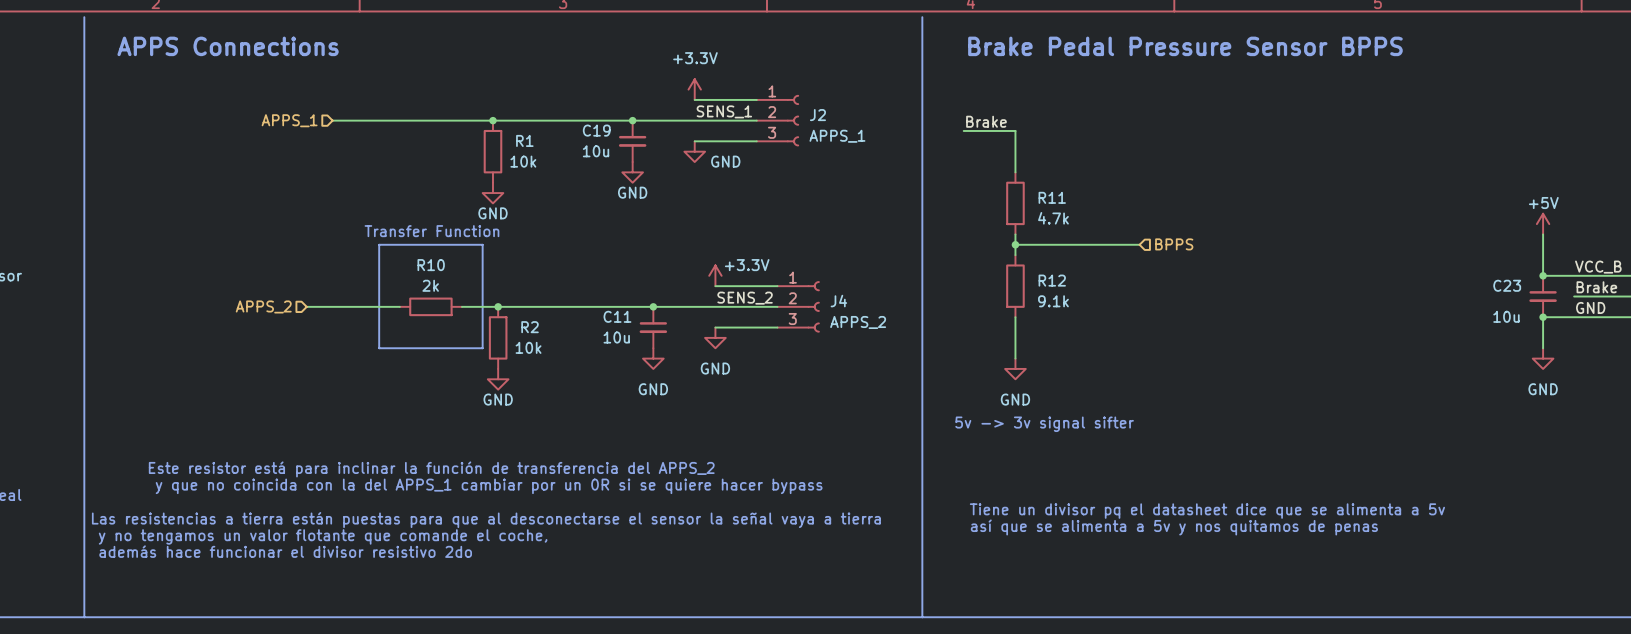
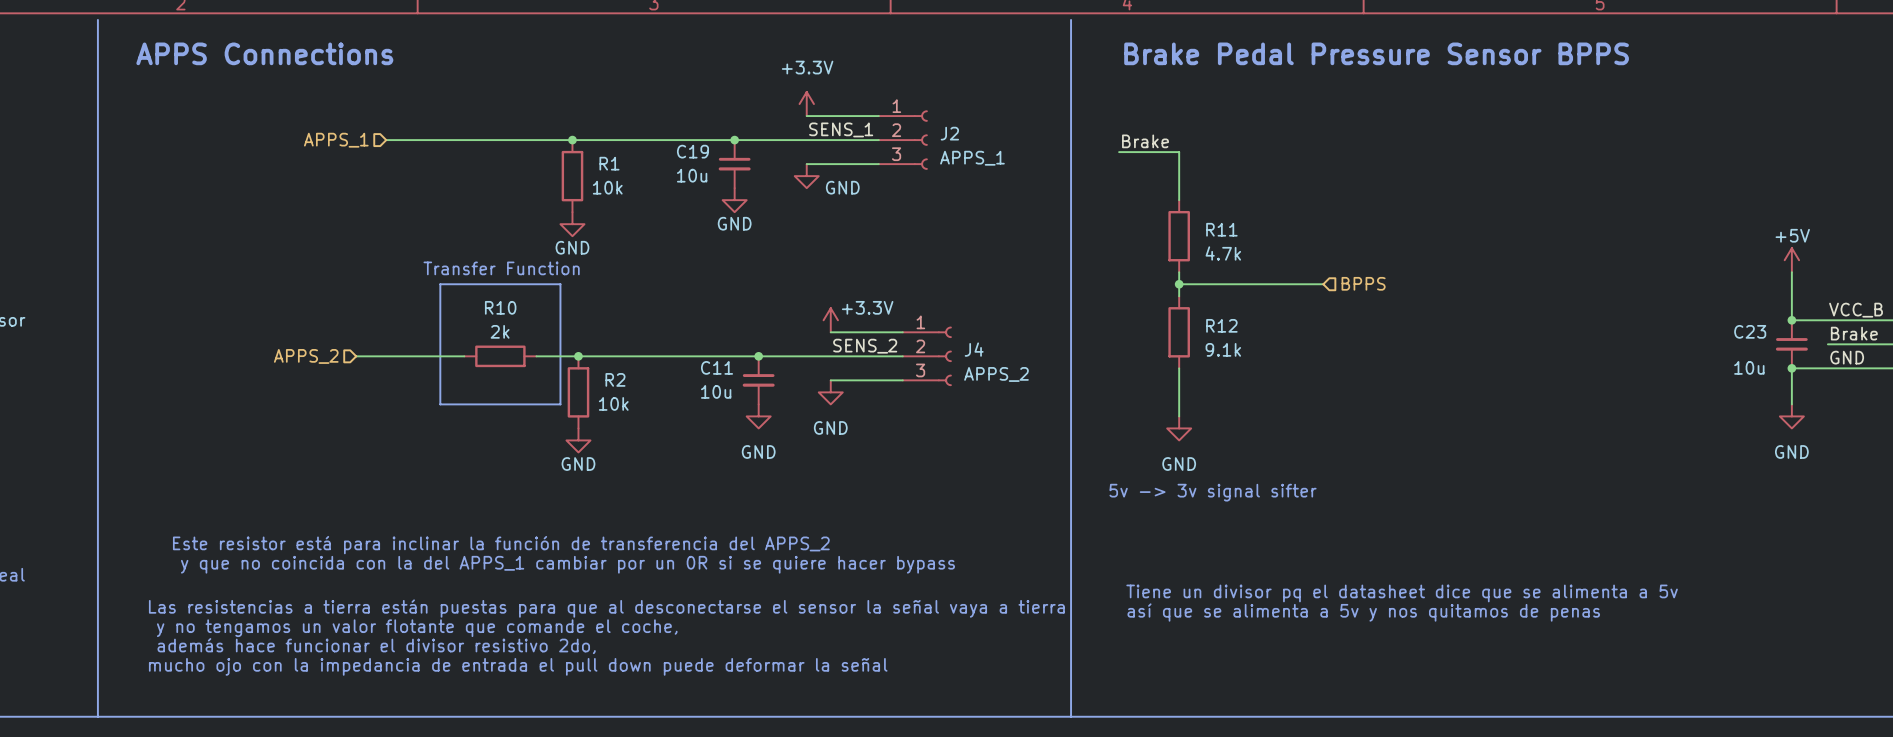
text position: Las resistencias a tierra están puestas para que al desconectarse el sensor la señal vaya a tierra (486, 520) -> Las resistencias a tierra están puestas para que al desconectarse el sensor la señal vaya a tierra (606, 608)
text position: y no tengamos un valor flotante que comande el coche, (323, 536) -> y no tengamos un valor flotante que comande el coche, (417, 628)
text: además hace funcionar el divisor resistivo 2do (285, 551) -> además hace funcionar el divisor resistivo 2do, (376, 646)
text: none -> mucho ojo con la impedancia de entrada el pull down puede deformar la señal (518, 666)

